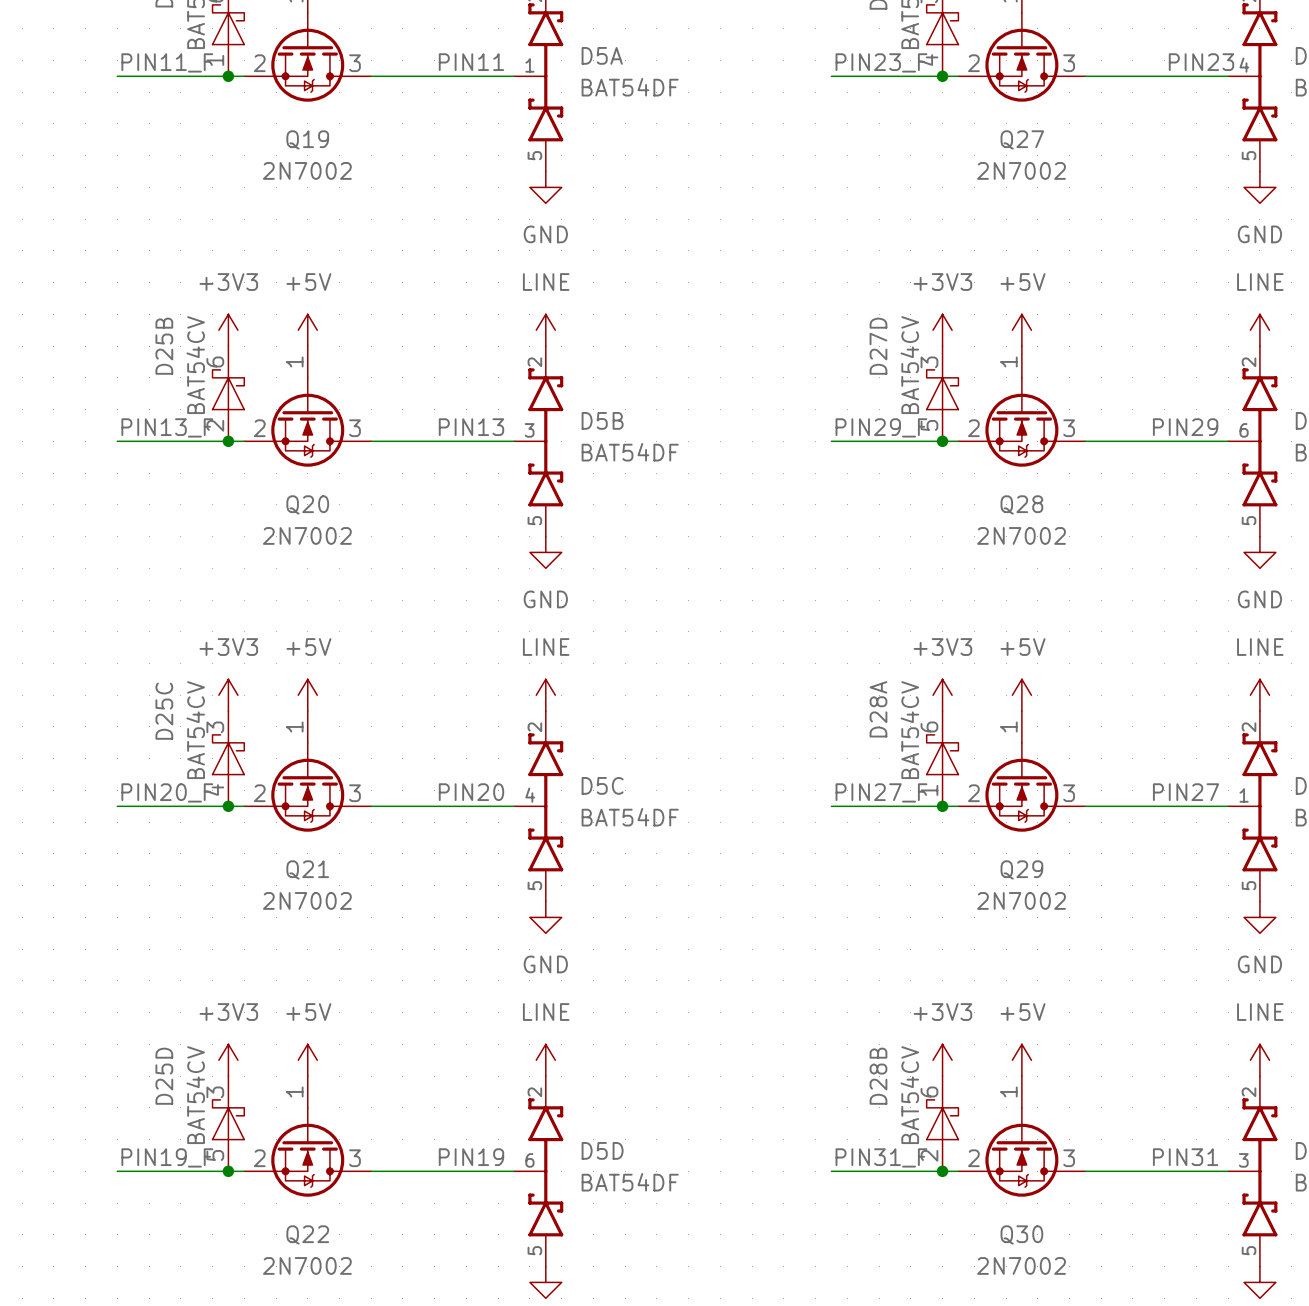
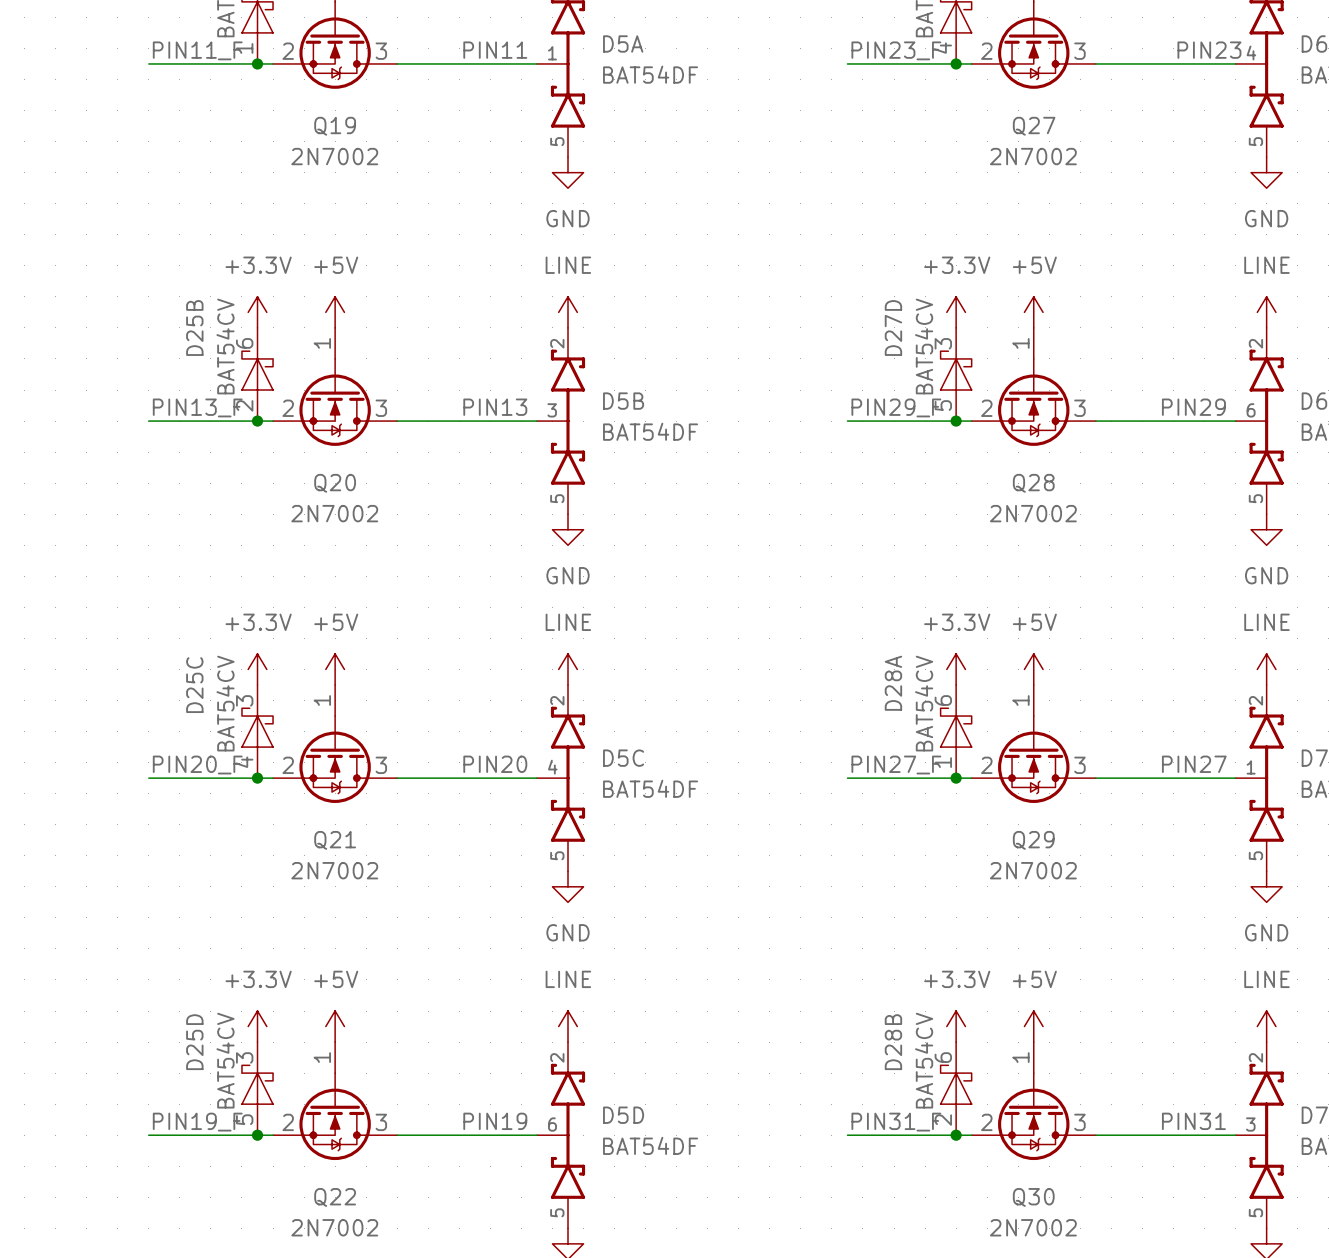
power symbol: +3V3 (228, 330) -> +3.3V (257, 312)
power symbol: +3V3 (942, 330) -> +3.3V (956, 312)
power symbol: +3V3 (228, 695) -> +3.3V (257, 669)
power symbol: +3V3 (942, 695) -> +3.3V (956, 669)
power symbol: +3V3 (228, 1060) -> +3.3V (257, 1026)
power symbol: +3V3 (942, 1060) -> +3.3V (956, 1026)

